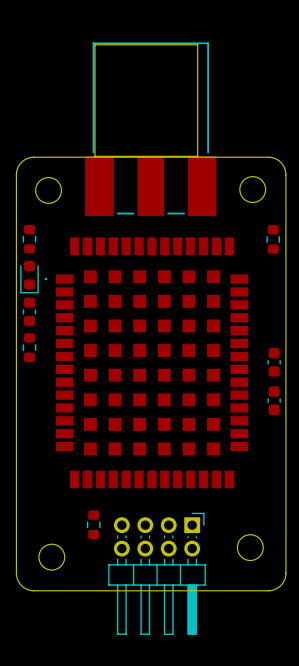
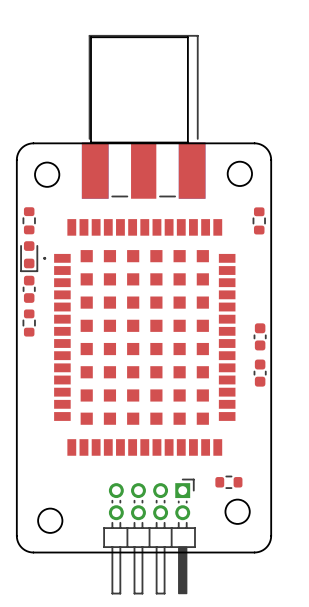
part rotation: 0° (93, 524) -> 90° clockwise (228, 482)
part position: (93, 524) -> (228, 482)

